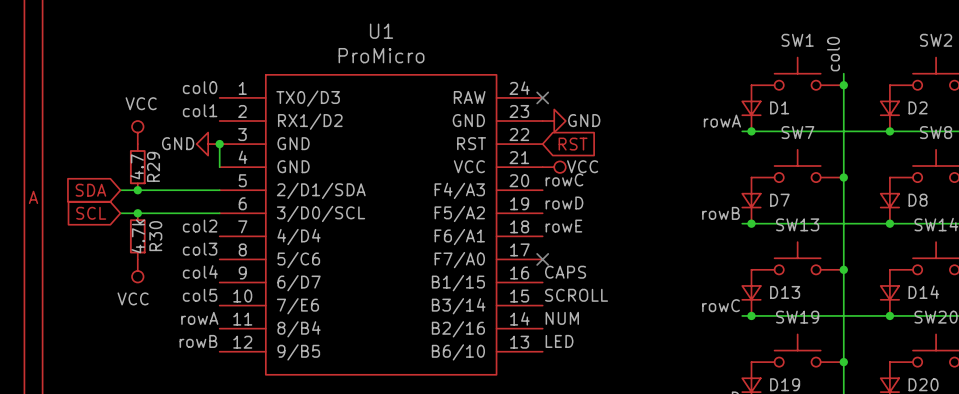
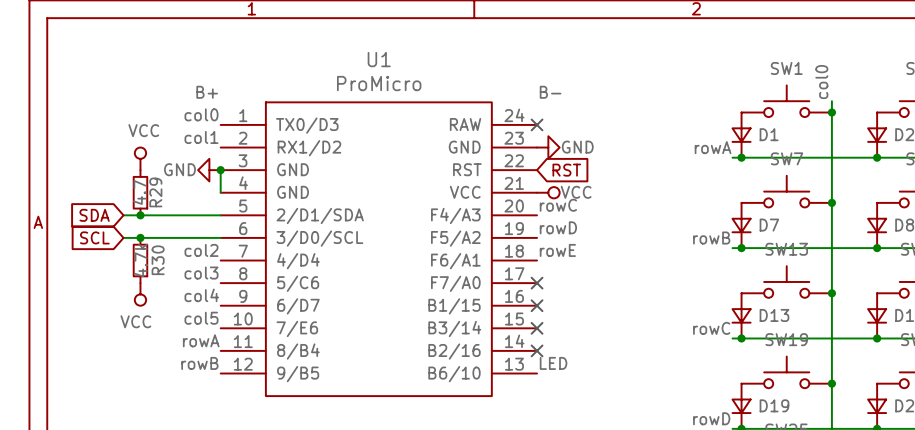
label: none -> B+ (207, 92)
label: none -> B- (550, 92)
label: CAPS (565, 272) -> none
no-connect mark: none -> (537, 305)
label: SCROLL (576, 295) -> none
no-connect mark: none -> (537, 328)
label: NUM (562, 318) -> none
no-connect mark: none -> (537, 350)

